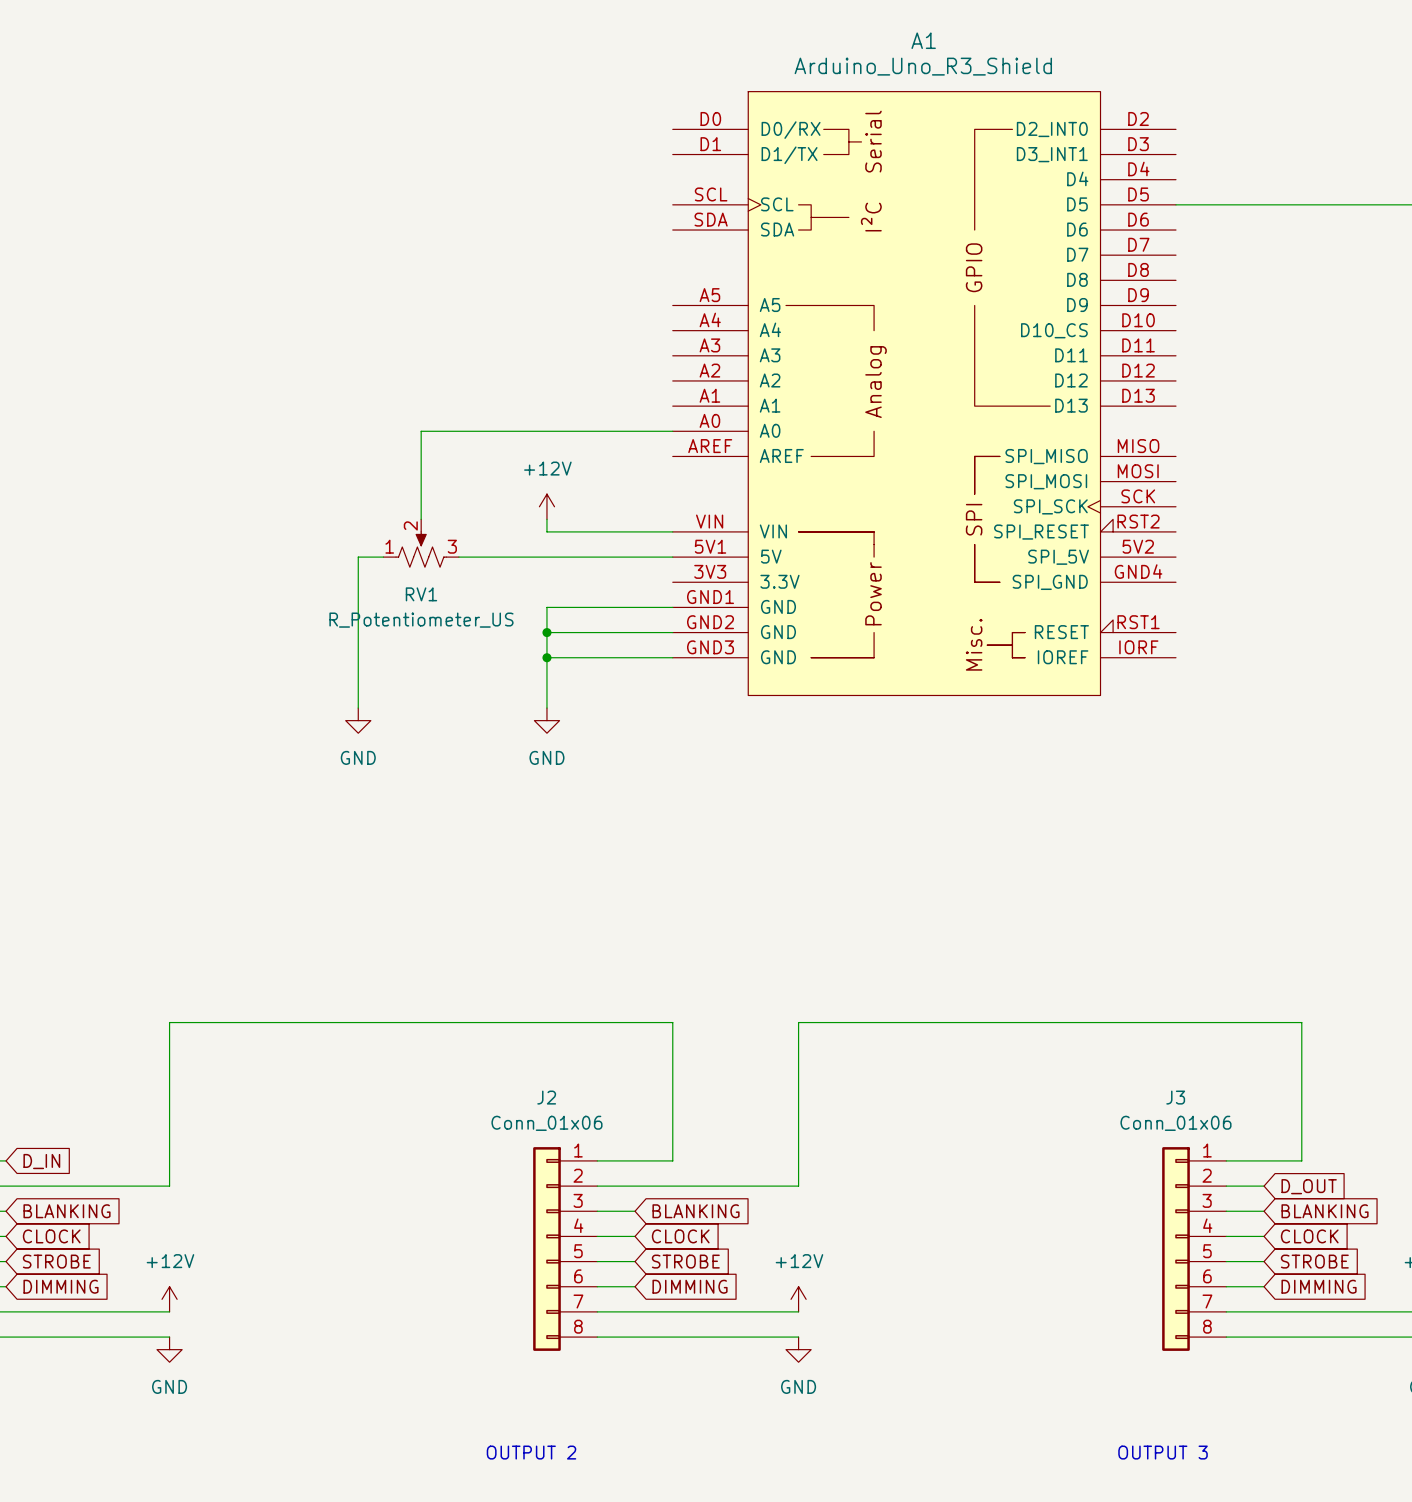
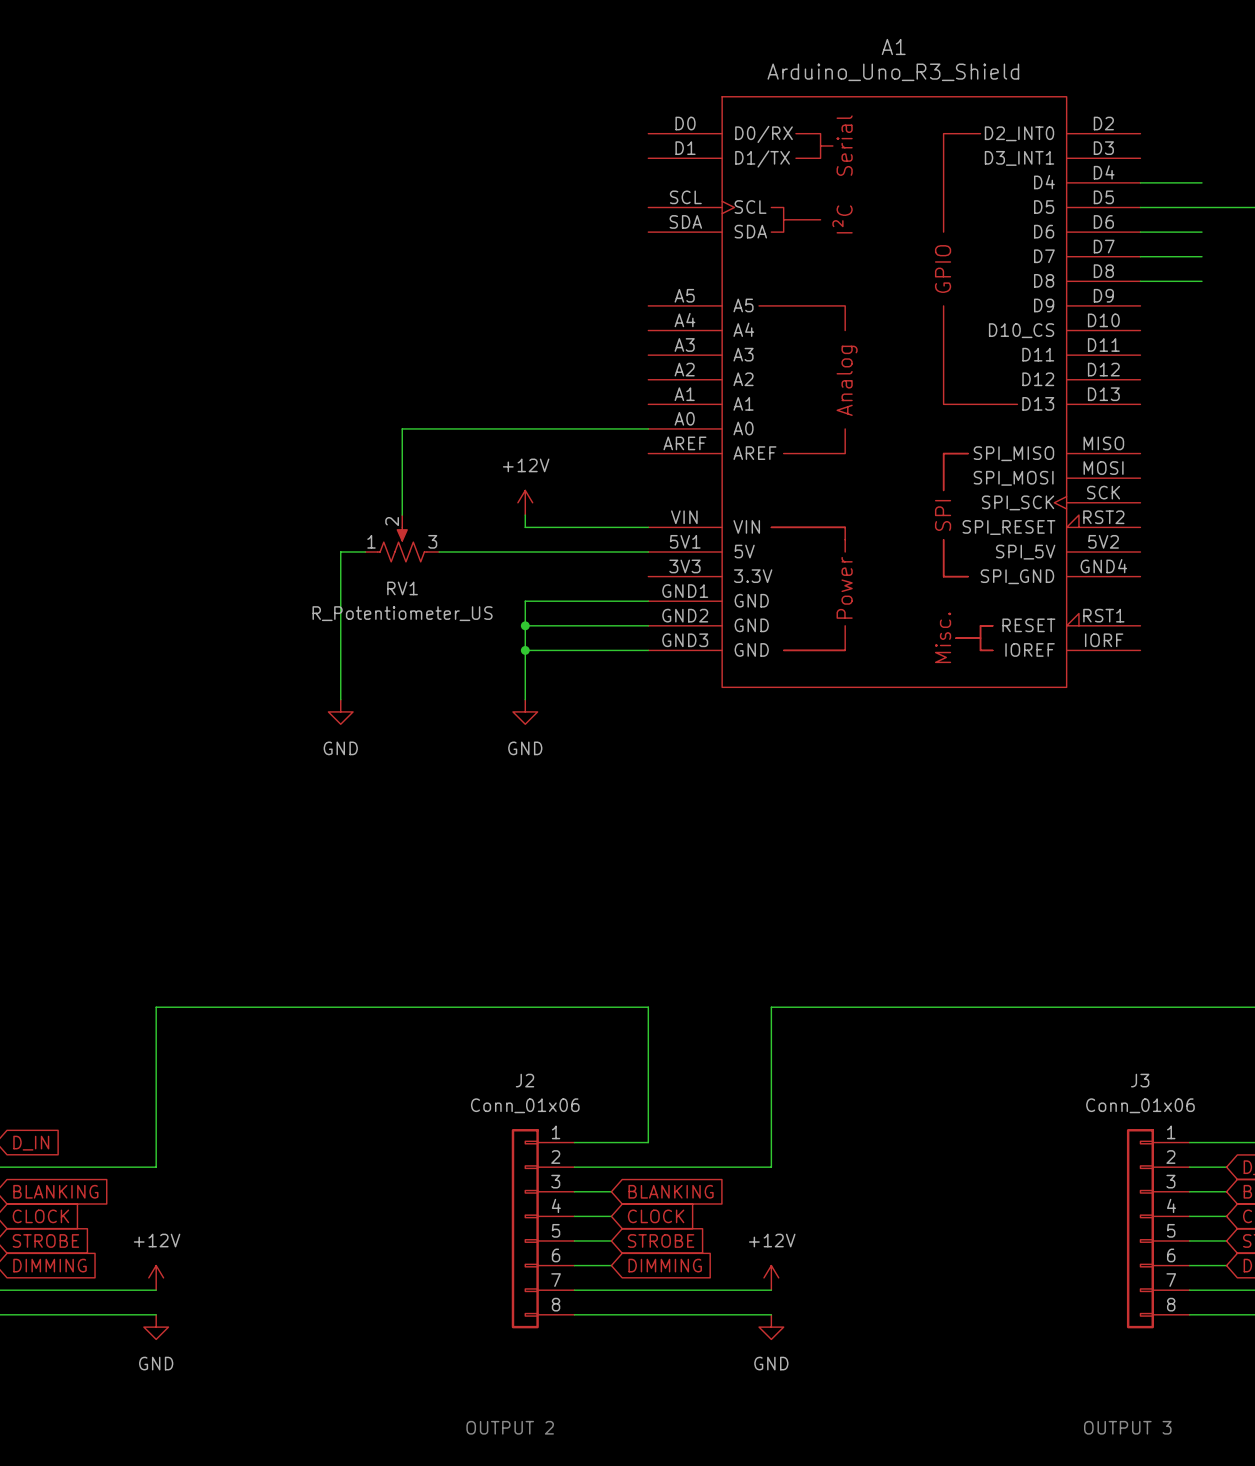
wire: none -> (1140, 182) (1201, 182)
wire: none -> (1140, 232) (1201, 232)
wire: none -> (1140, 256) (1201, 256)
wire: none -> (1140, 281) (1201, 281)

